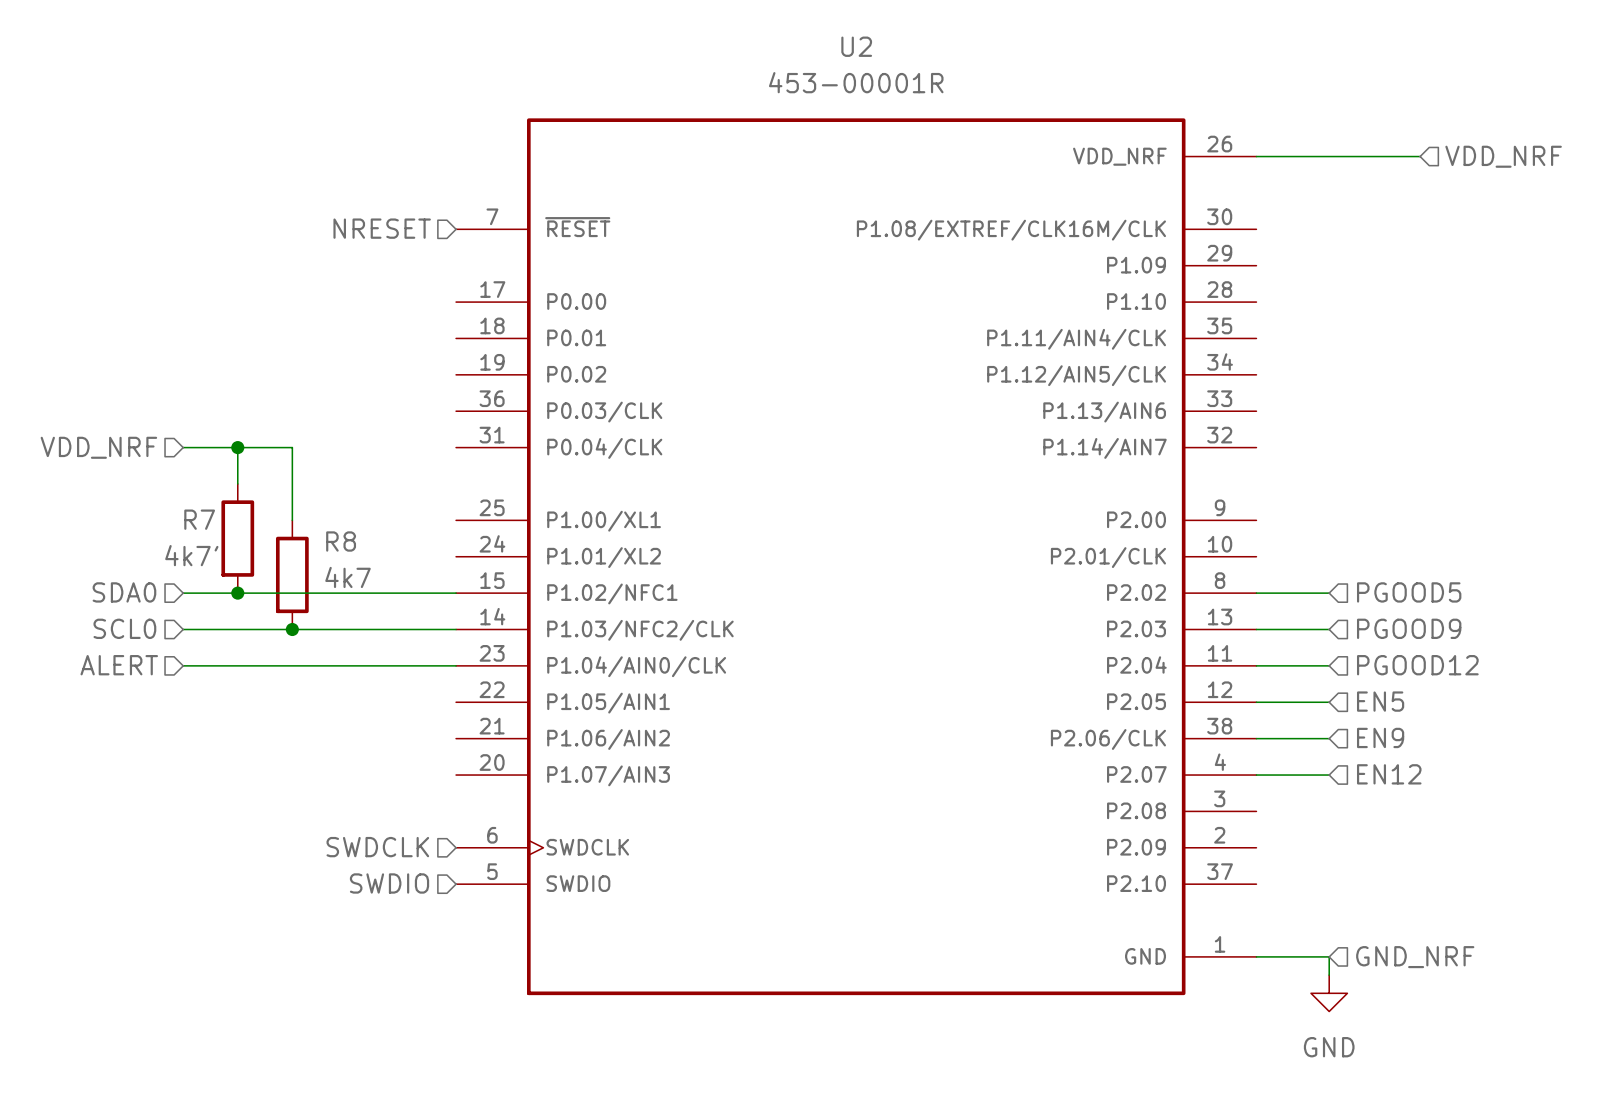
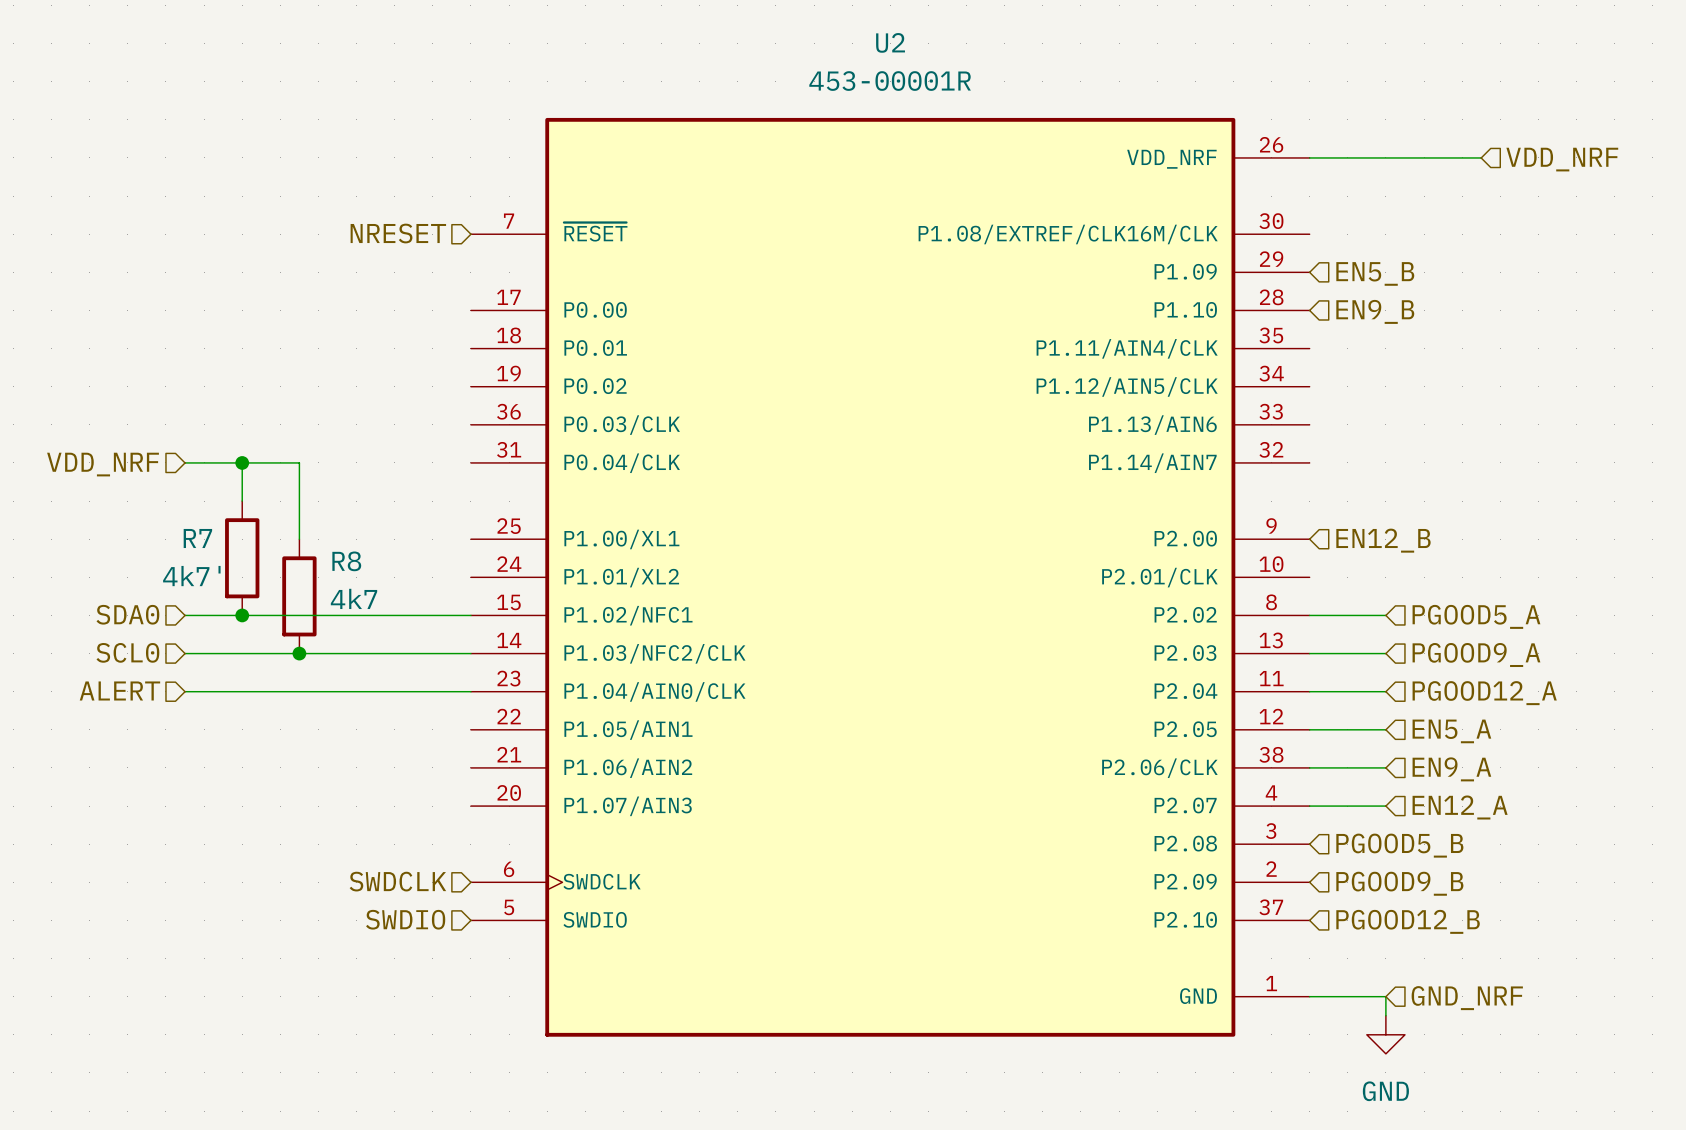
hierarchical label: none -> EN5_B (1375, 273)
hierarchical label: none -> EN9_B (1375, 311)
hierarchical label: none -> EN12_B (1383, 540)
hierarchical label: PGOOD5 (1409, 592) -> PGOOD5_A (1476, 616)
hierarchical label: PGOOD9 (1409, 628) -> PGOOD9_A (1476, 655)
hierarchical label: PGOOD12 (1417, 665) -> PGOOD12_A (1484, 693)
hierarchical label: EN5 (1380, 701) -> EN5_A (1451, 731)
hierarchical label: EN9 (1380, 737) -> EN9_A (1451, 769)
hierarchical label: EN12 (1389, 774) -> EN12_A (1460, 807)
hierarchical label: none -> PGOOD5_B (1399, 845)
hierarchical label: none -> PGOOD9_B (1399, 883)
hierarchical label: none -> PGOOD12_B (1408, 921)

